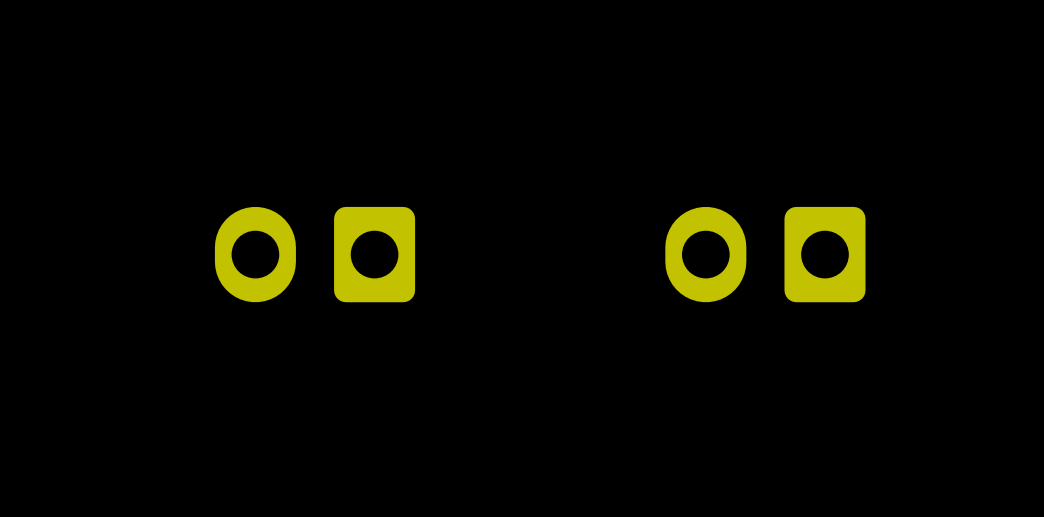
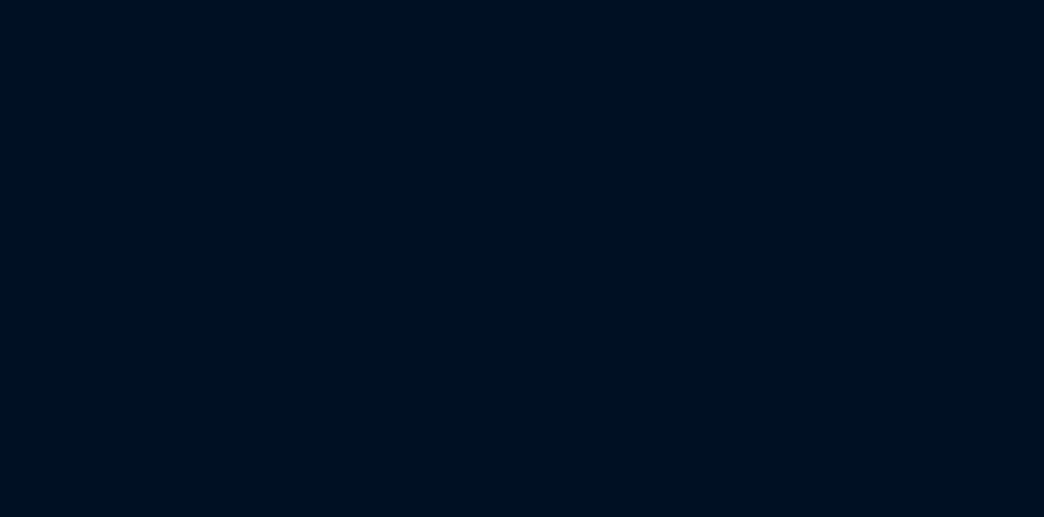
part: (315, 254) -> none
part: (765, 254) -> none

